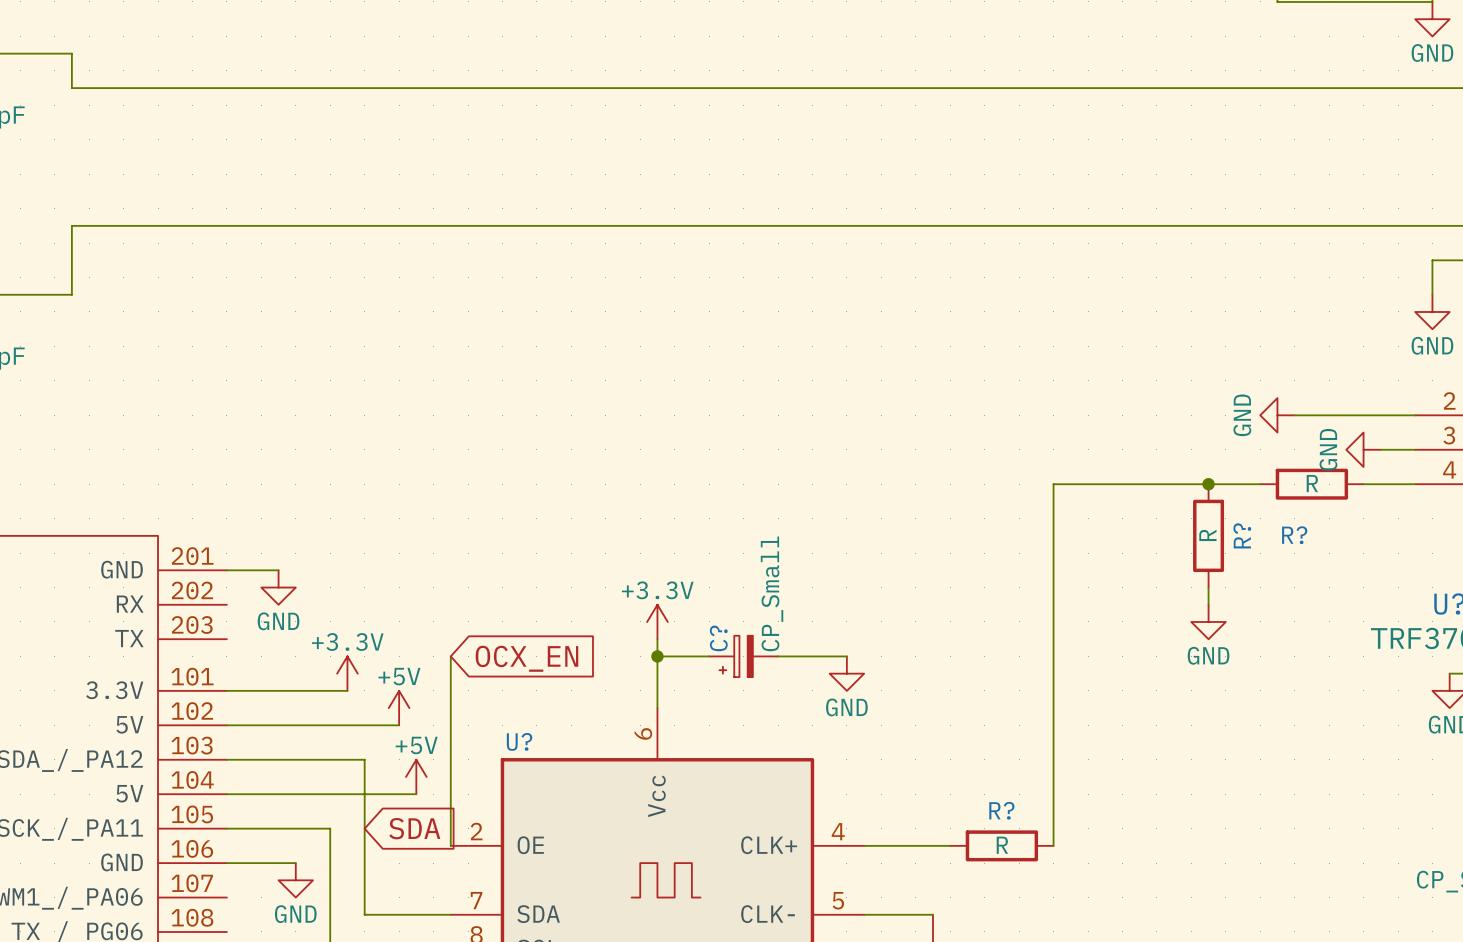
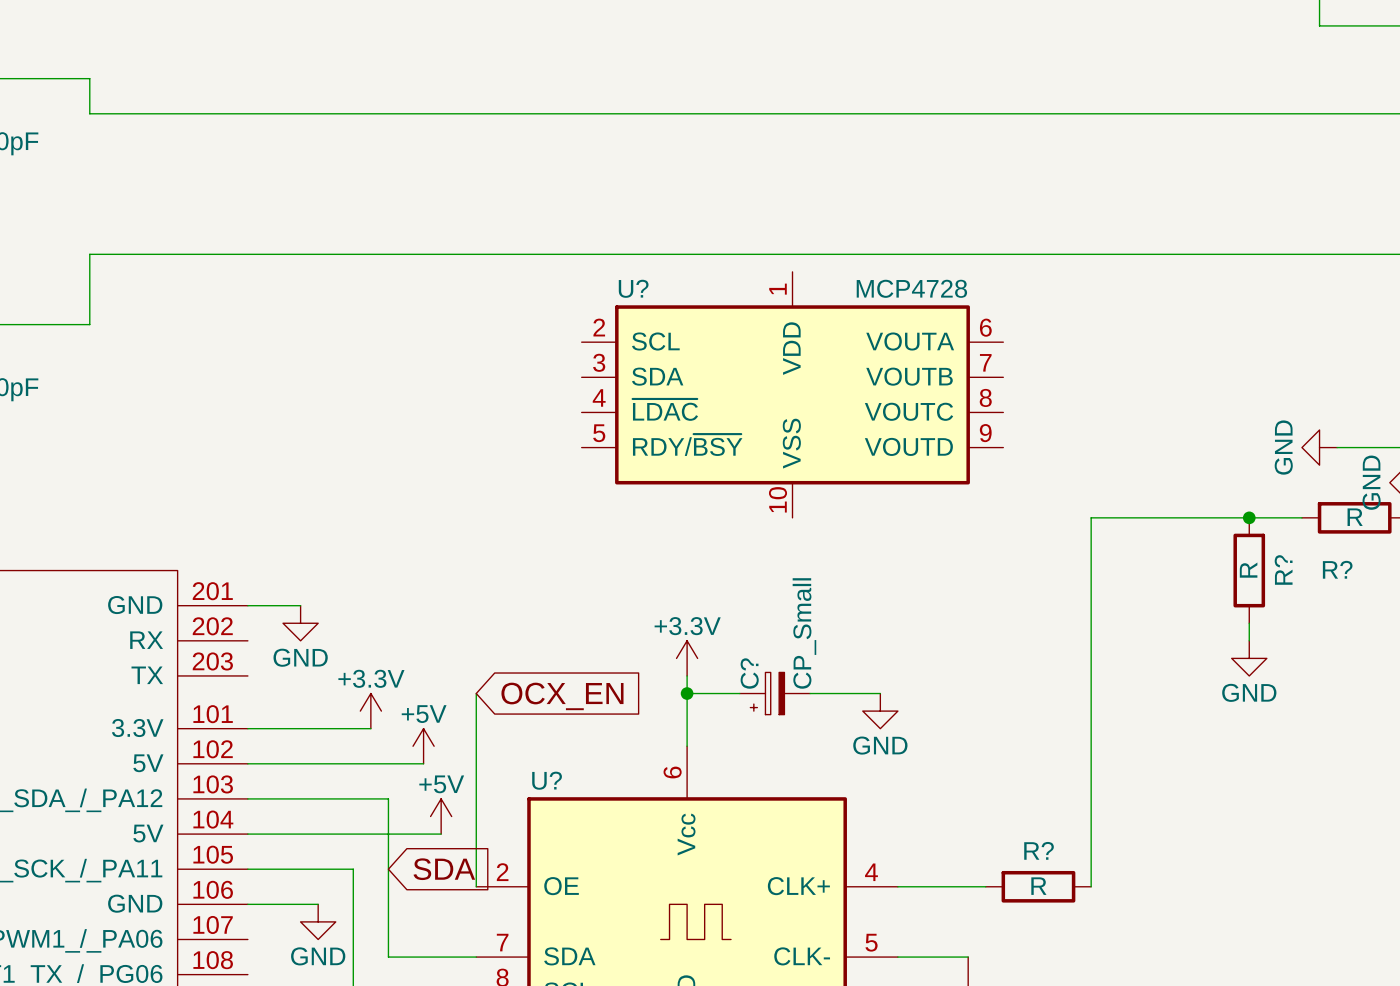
U?: none -> MCP4728 (792, 394)

